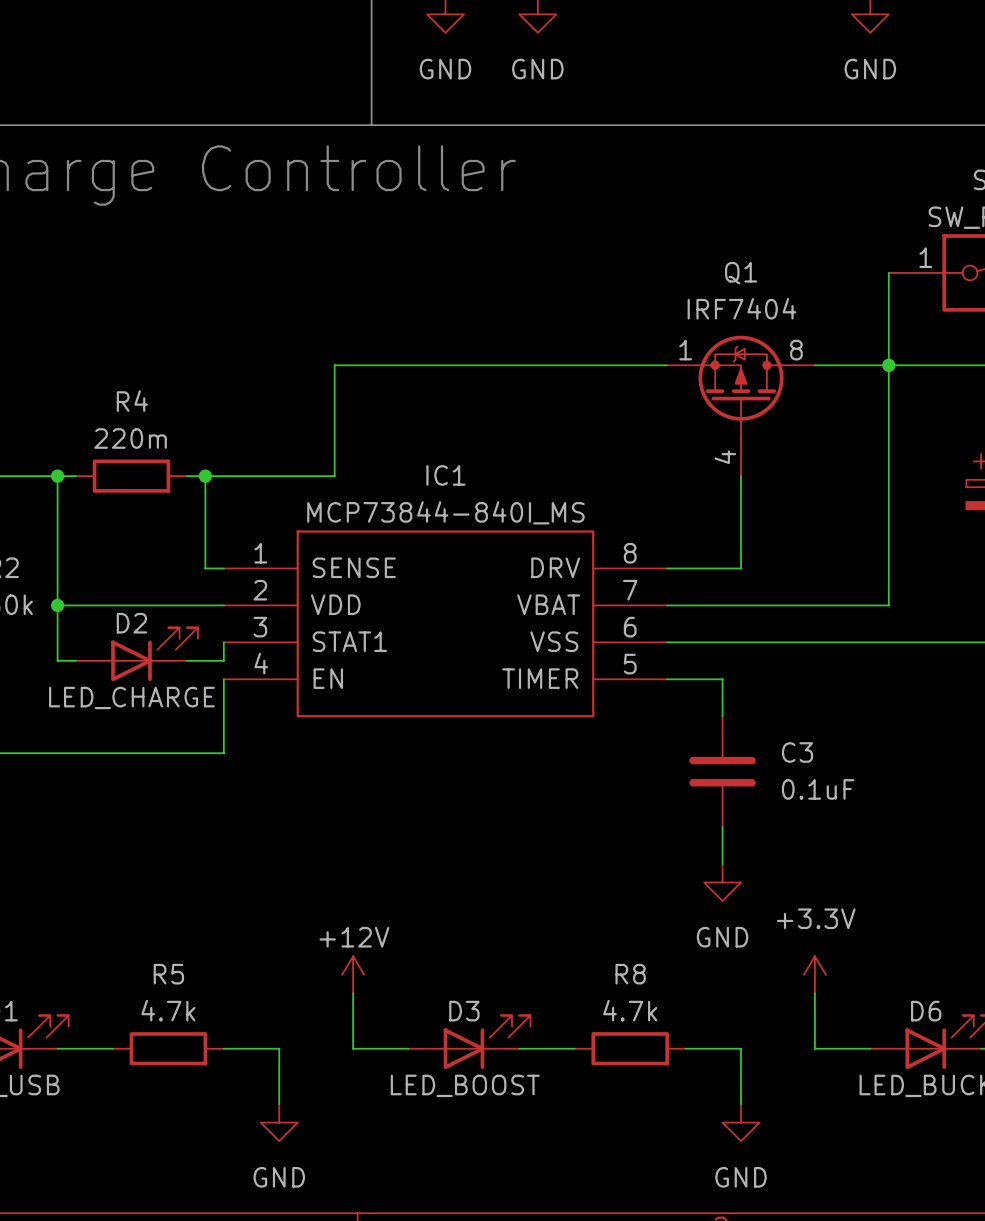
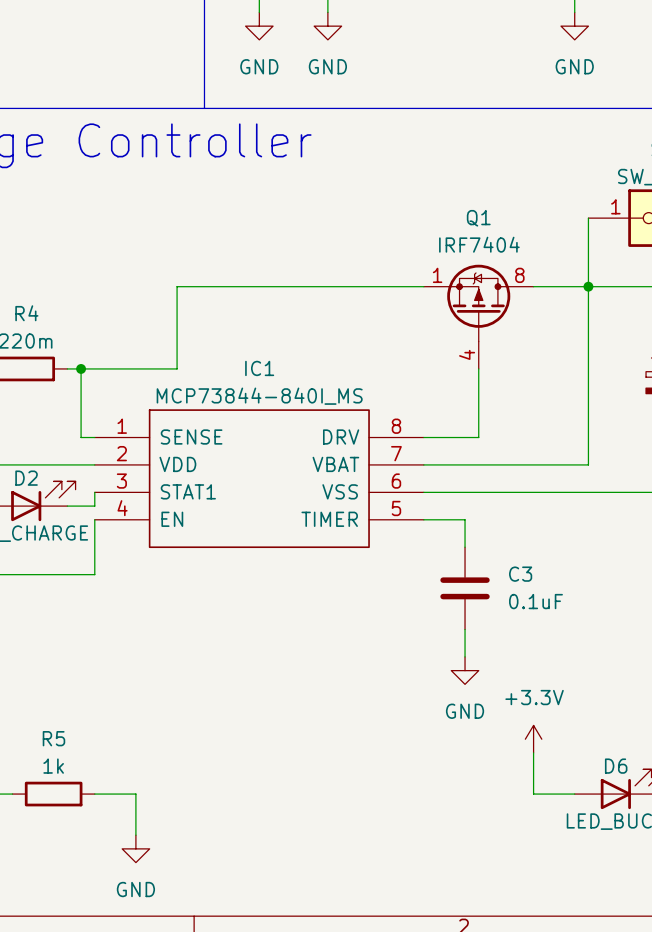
power symbol: +12V (353, 974) -> none
wire: (353, 993) (353, 1048) (408, 1048) -> none
R5 value: 4.7k (168, 1010) -> 1k (53, 766)
D3: LED_BOOST (469, 1042) -> none
wire: (519, 1048) (574, 1048) -> none
R8: 4.7k (630, 1048) -> none
wire: (685, 1048) (741, 1048) (741, 1104) -> none
power symbol: GND (741, 1122) -> none

